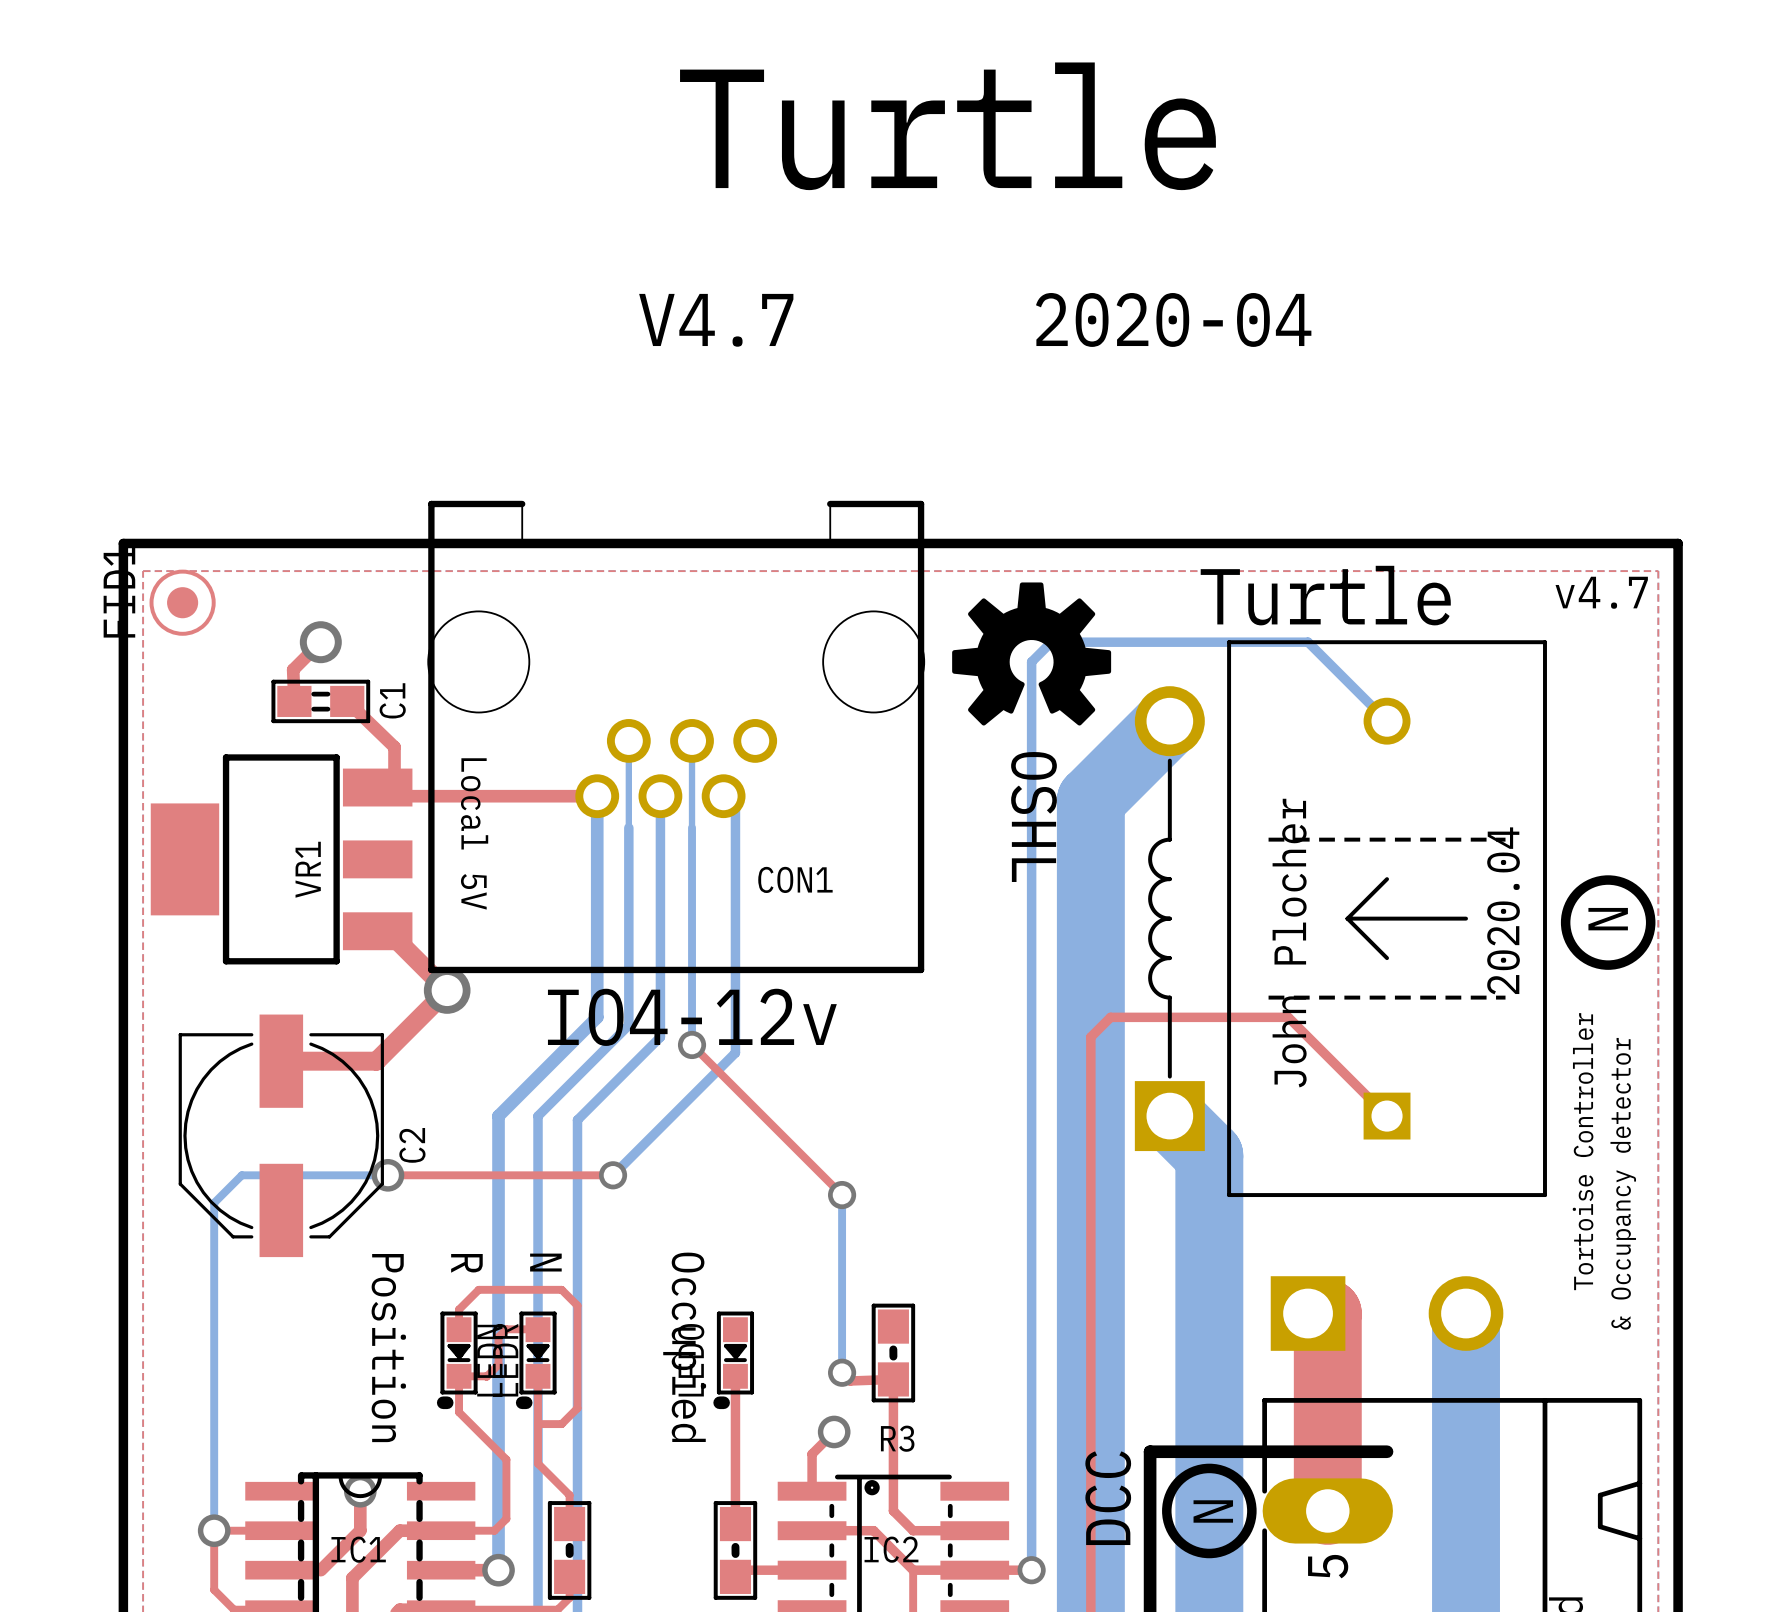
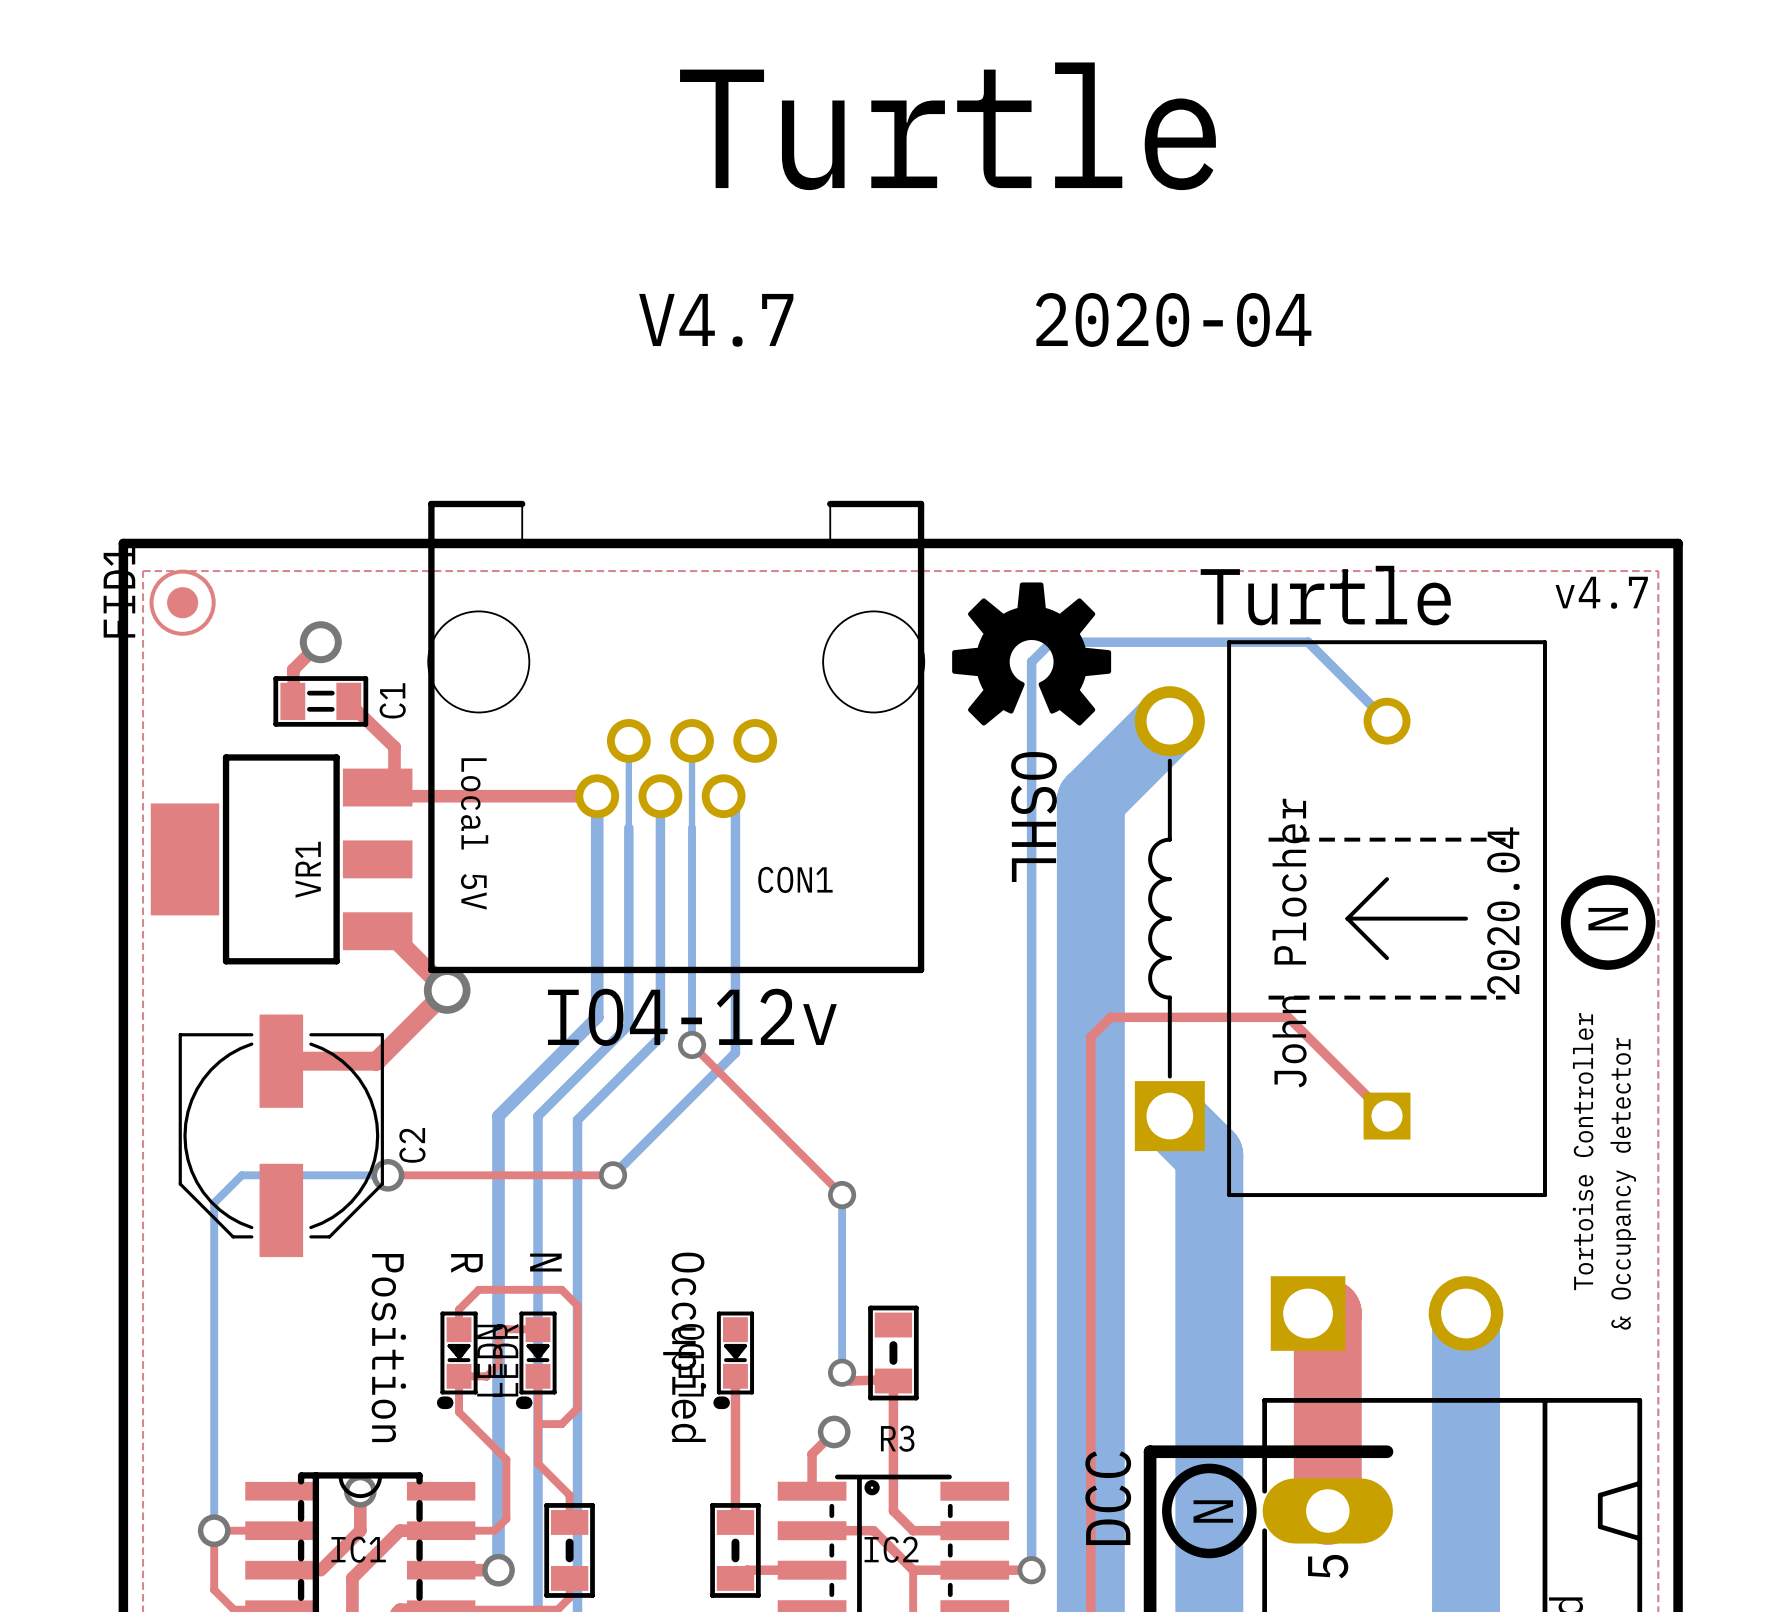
C1 footprint: [271, 679, 371, 724] -> [273, 676, 369, 727]
R3 footprint: [871, 1303, 916, 1403] -> [868, 1305, 919, 1401]
part footprint: [547, 1501, 592, 1600] -> [544, 1503, 595, 1598]
part footprint: [713, 1501, 758, 1600] -> [710, 1503, 761, 1598]

